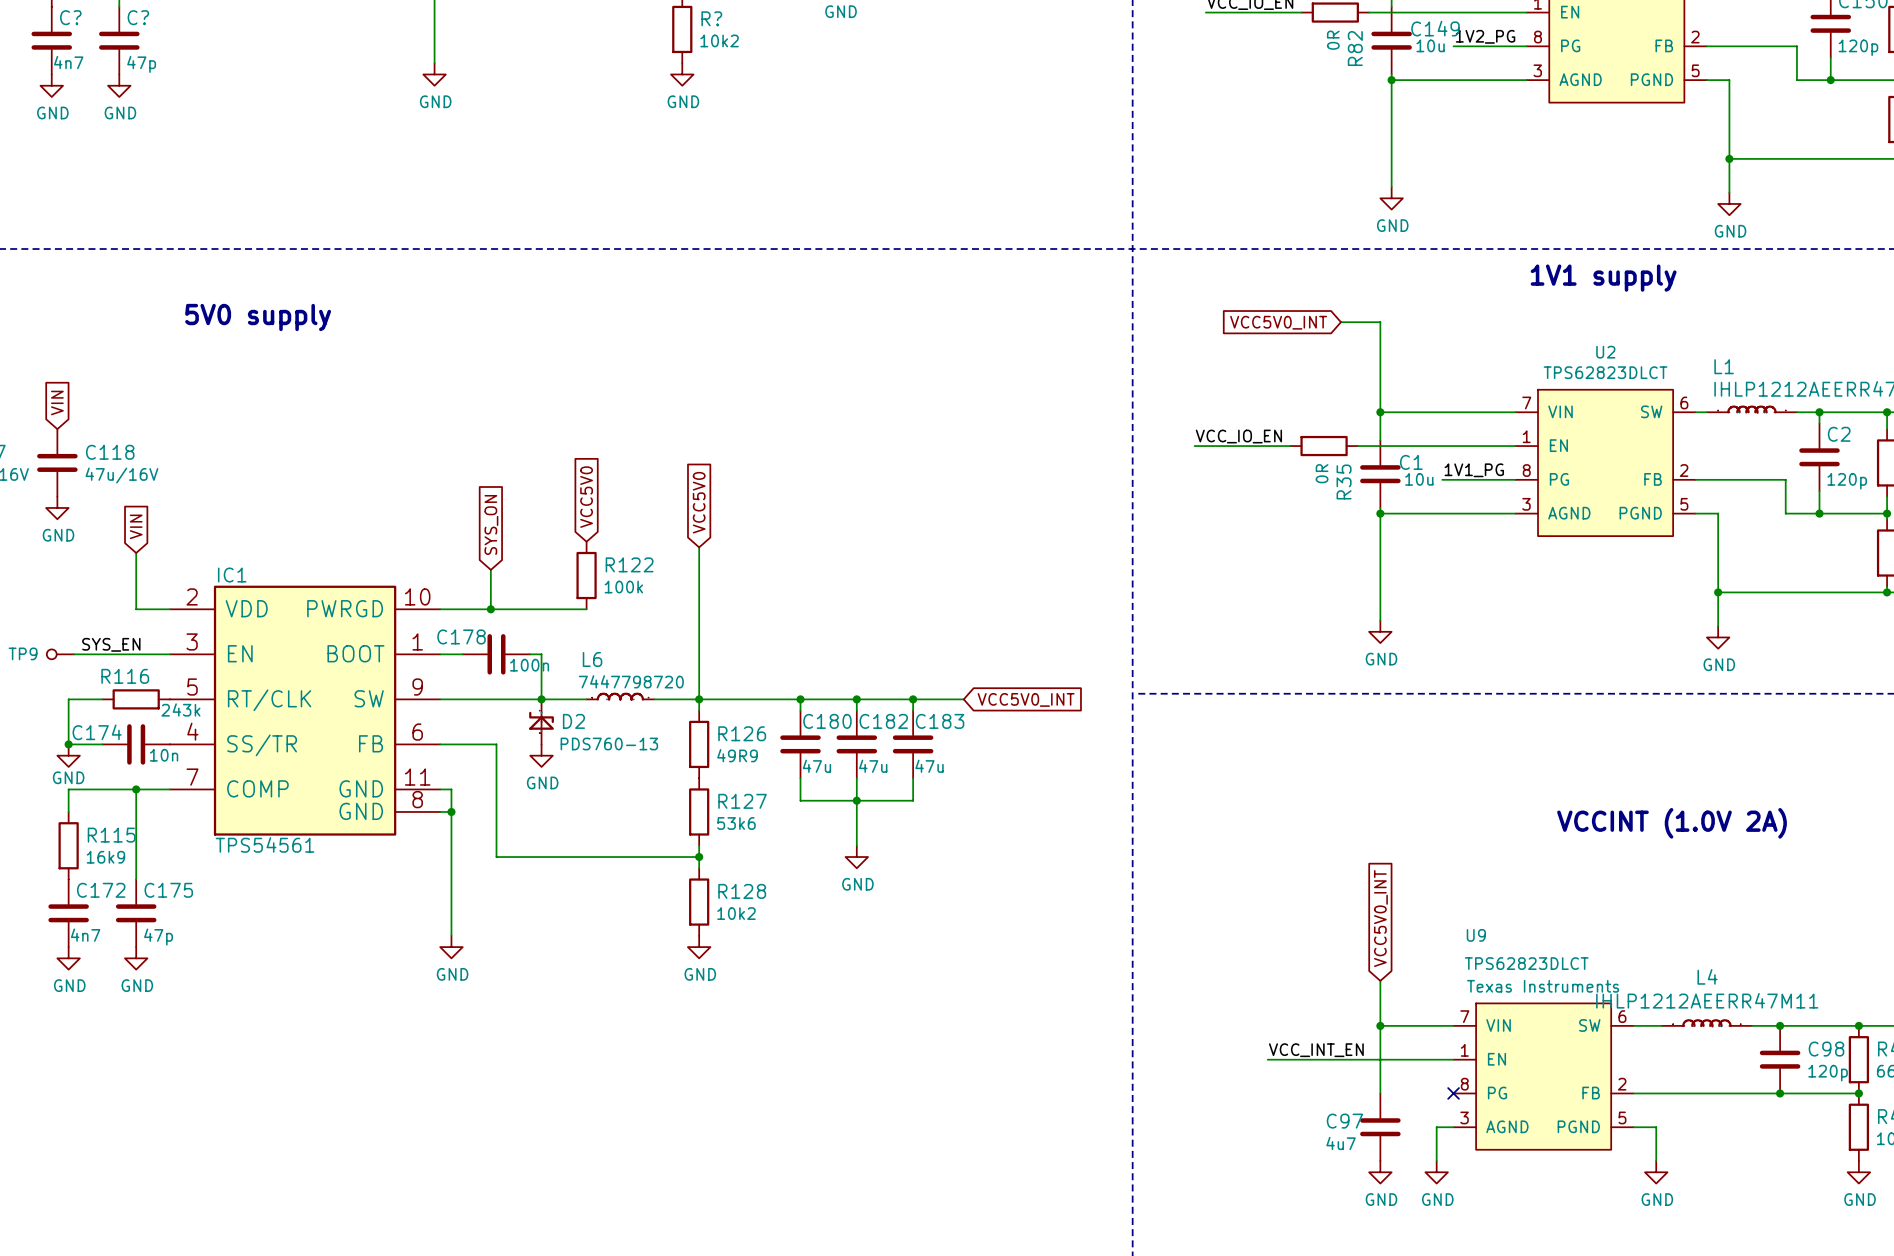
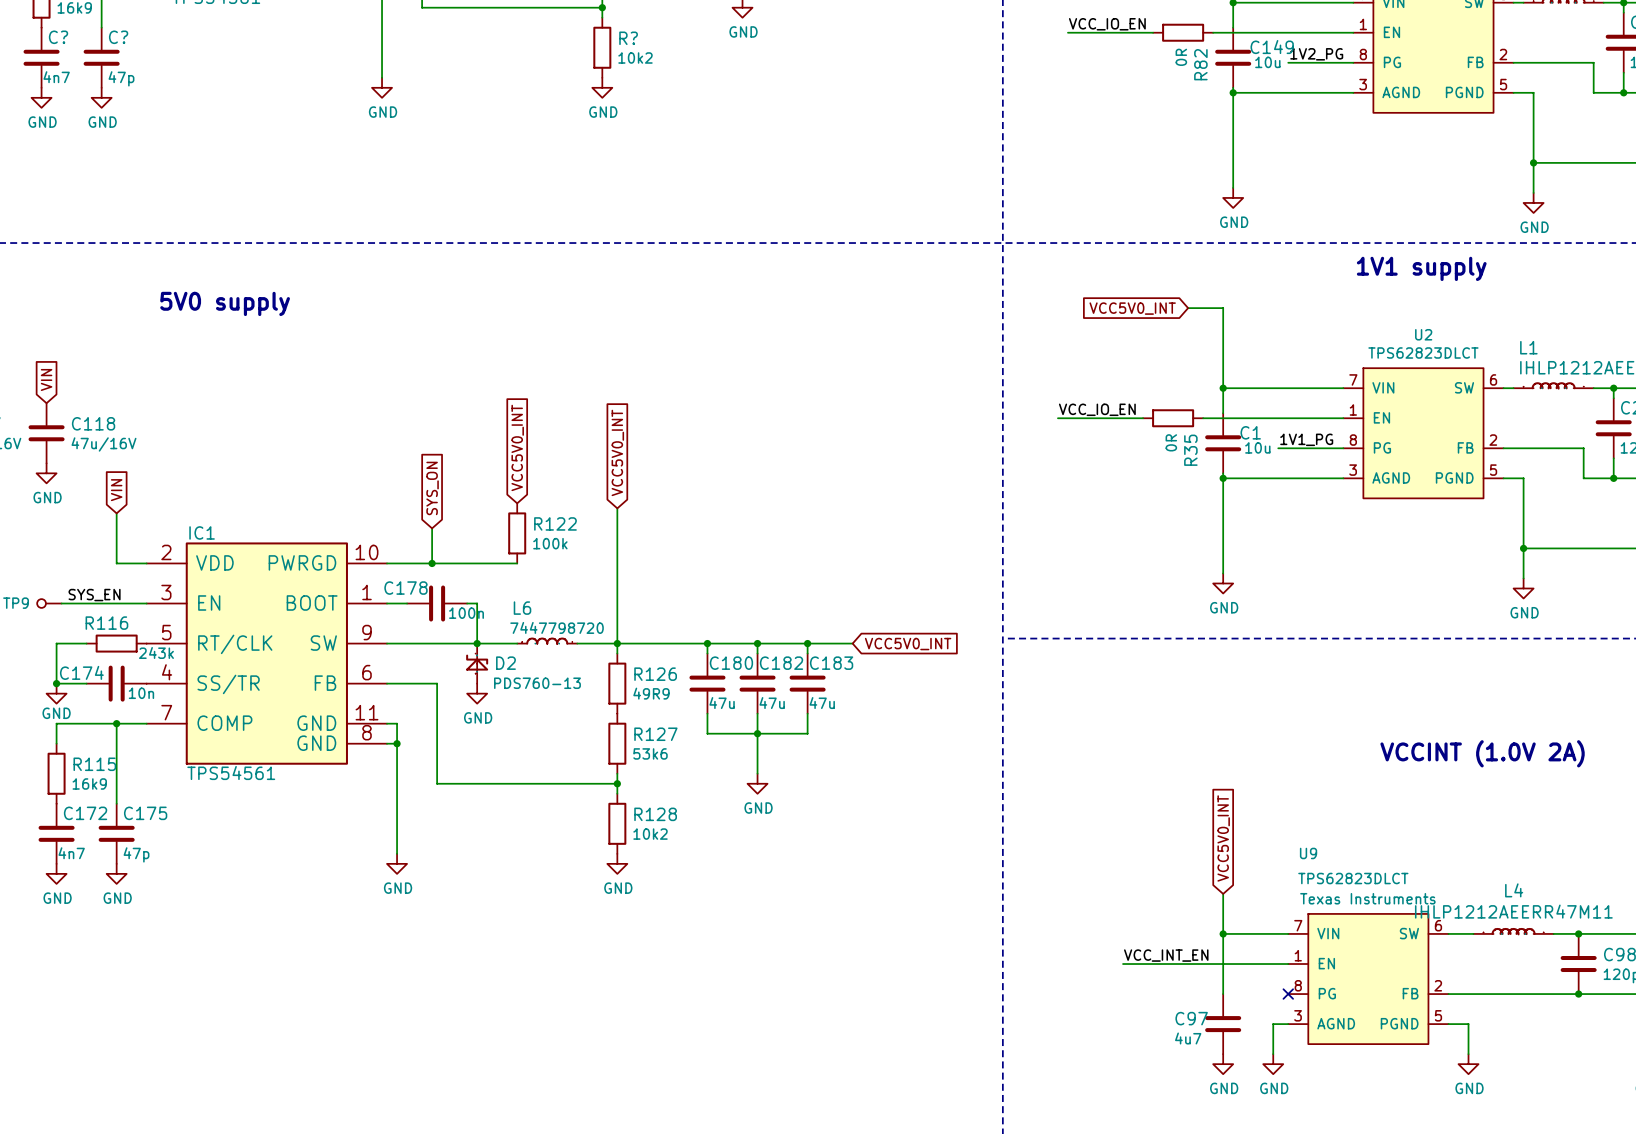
global label: VCC5V0 (586, 497) -> VCC5V0_INT (517, 447)
global label: VCC5V0 (699, 502) -> VCC5V0_INT (617, 452)

